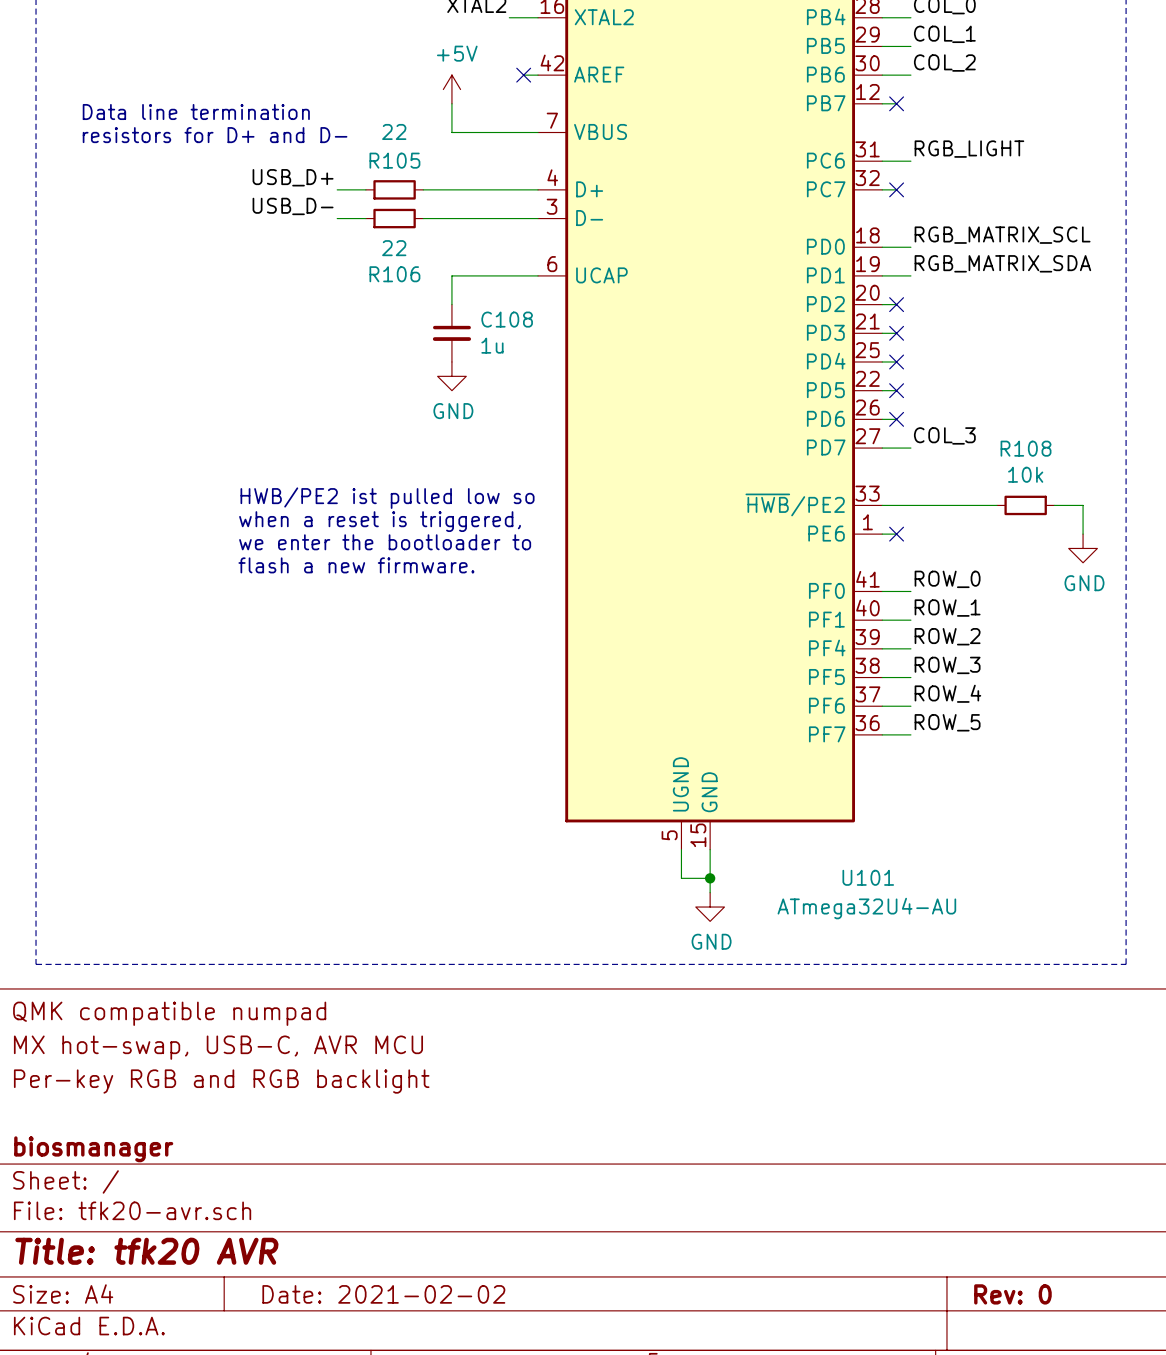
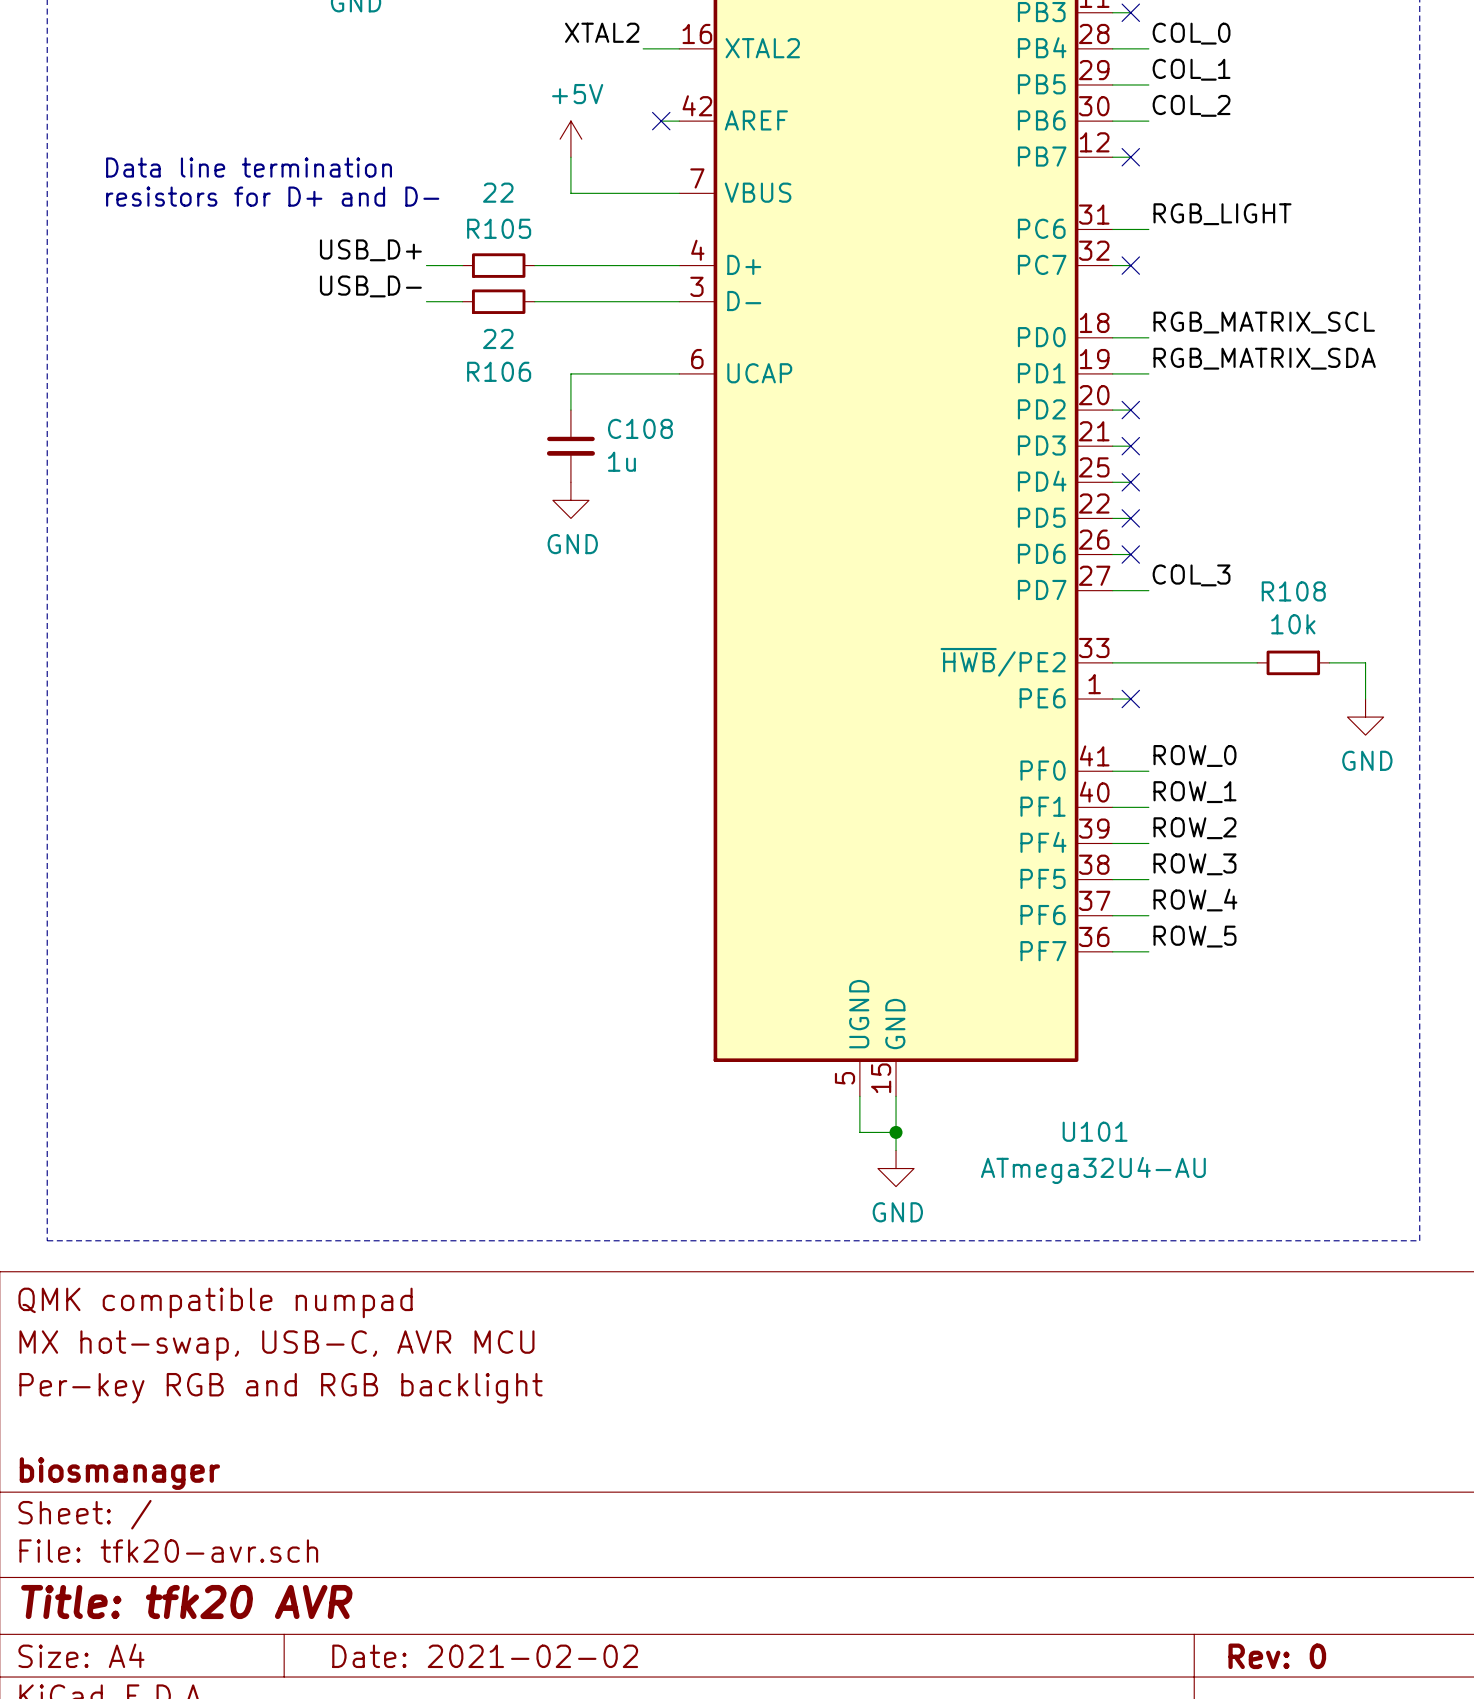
text: HWB/PE2 ist pulled low so (387, 498) -> none
text: when a reset is triggered, (380, 521) -> none
text: we enter the bootloader to (385, 542) -> none
text: flash a new firmware. (356, 565) -> none

